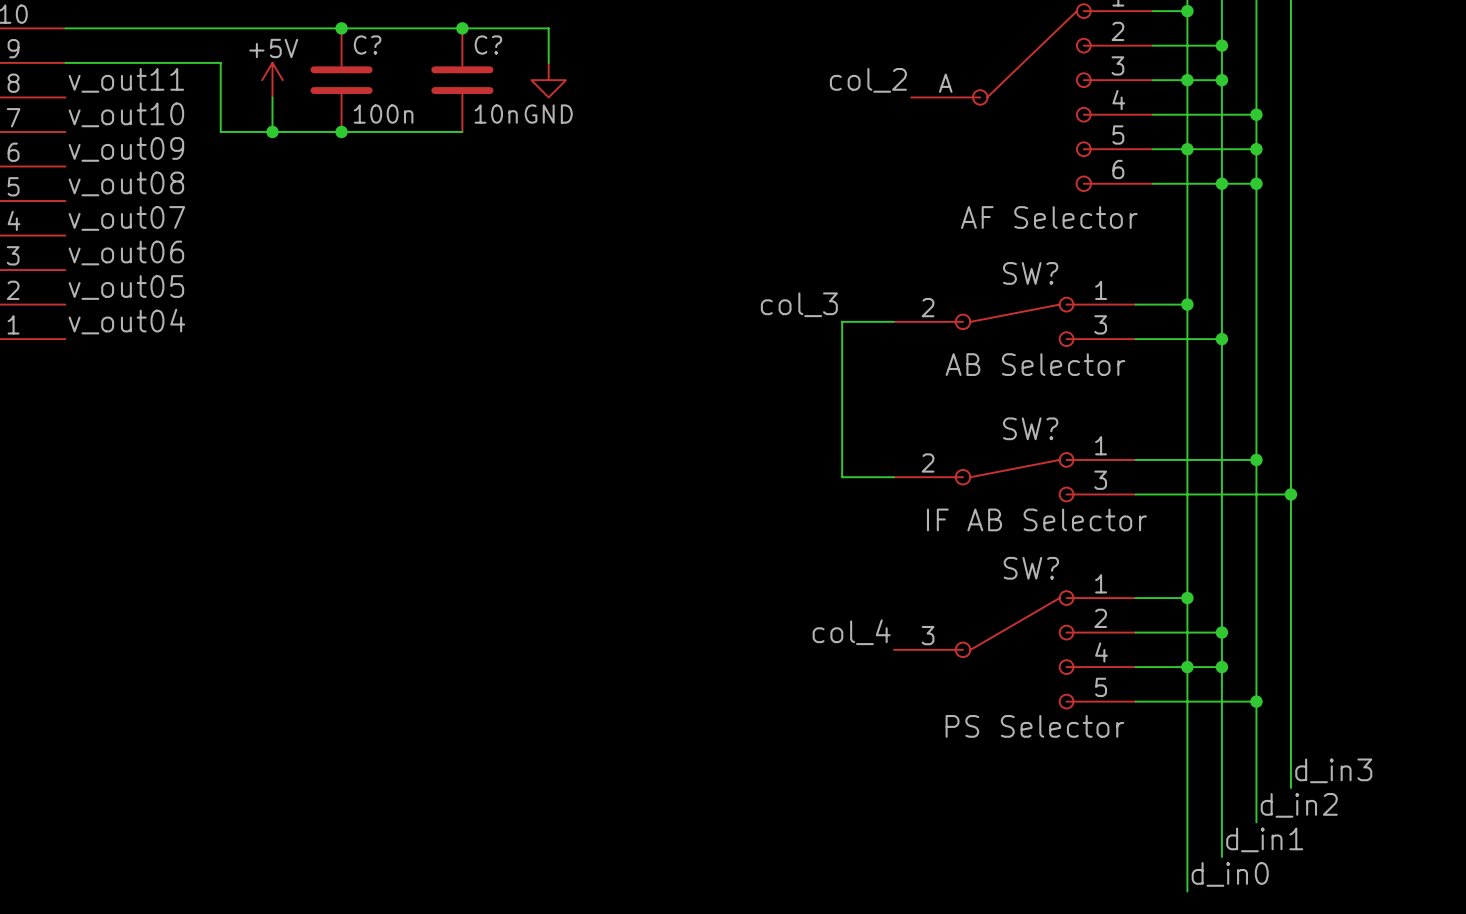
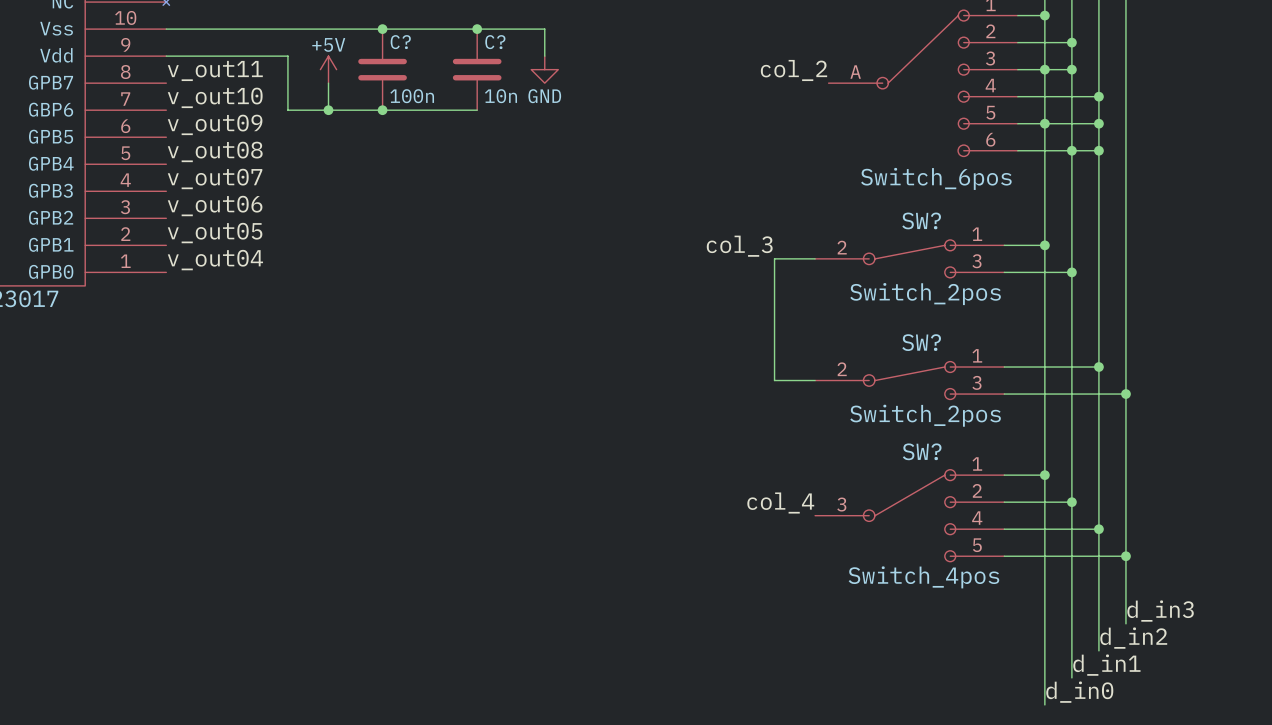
part value: AF Selector (1049, 217) -> Switch_6pos (936, 178)
SW? value: AB Selector (1035, 364) -> Switch_2pos (925, 294)
SW? value: IF AB Selector (1036, 519) -> Switch_2pos (925, 415)
junction: (1187, 667) -> none
wire: none -> (1071, 529) (1098, 529)
junction: (1221, 667) -> none
junction: none -> (1098, 529)
wire: none -> (1098, 556) (1125, 556)
junction: (1256, 701) -> none
junction: none -> (1125, 556)
SW? value: PS Selector (1034, 726) -> Switch_4pos (923, 577)

